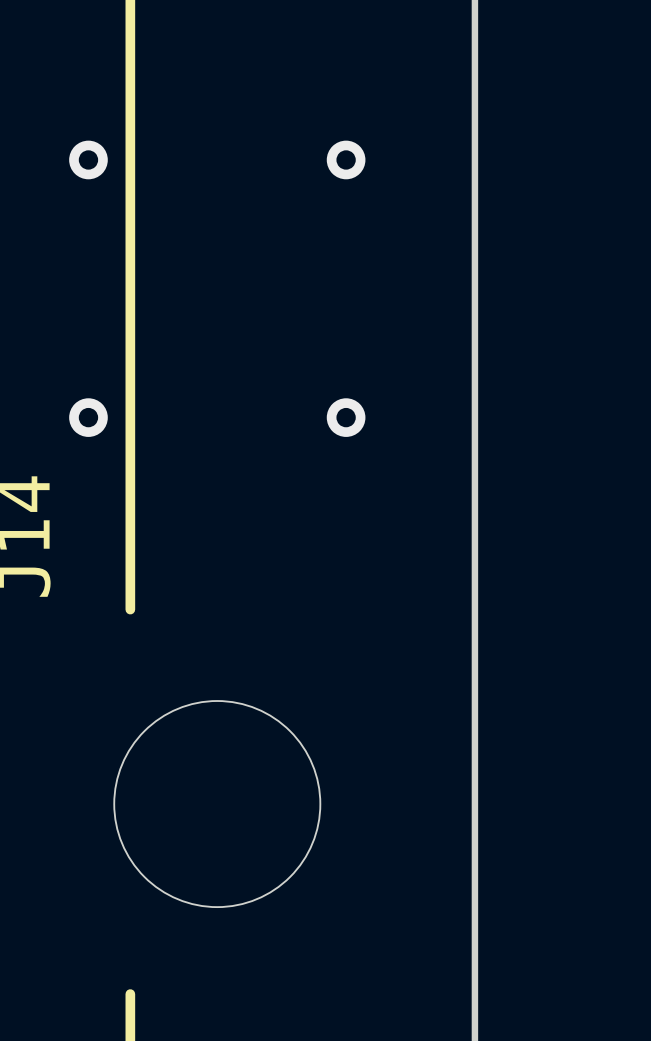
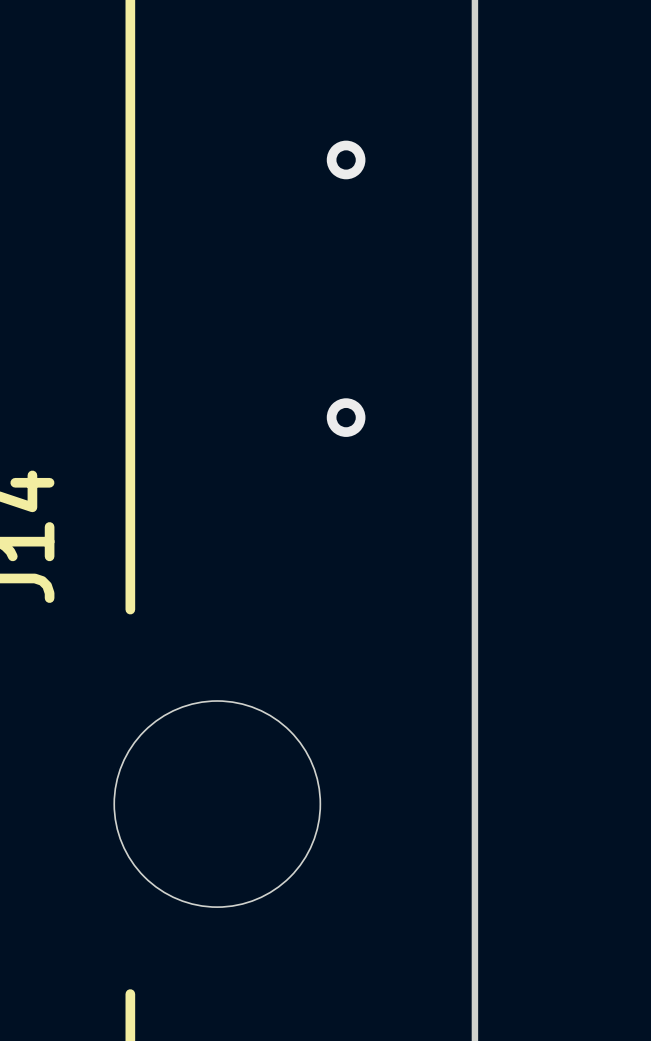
via: (88, 159) -> none
via: (88, 417) -> none

